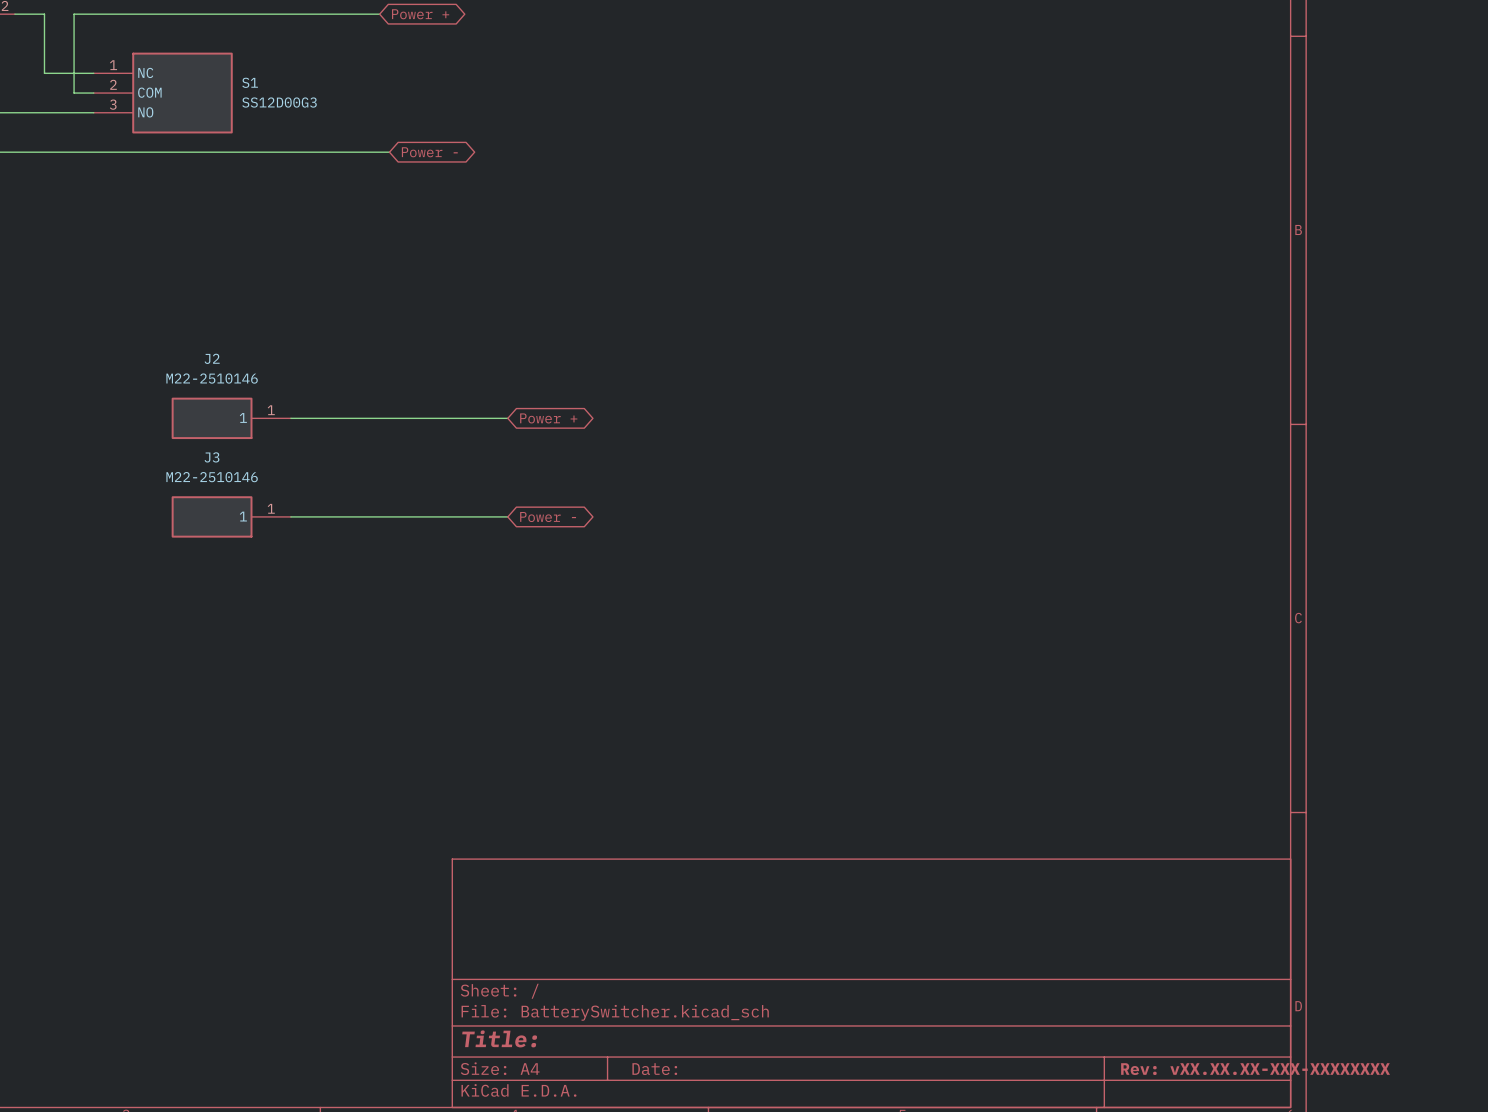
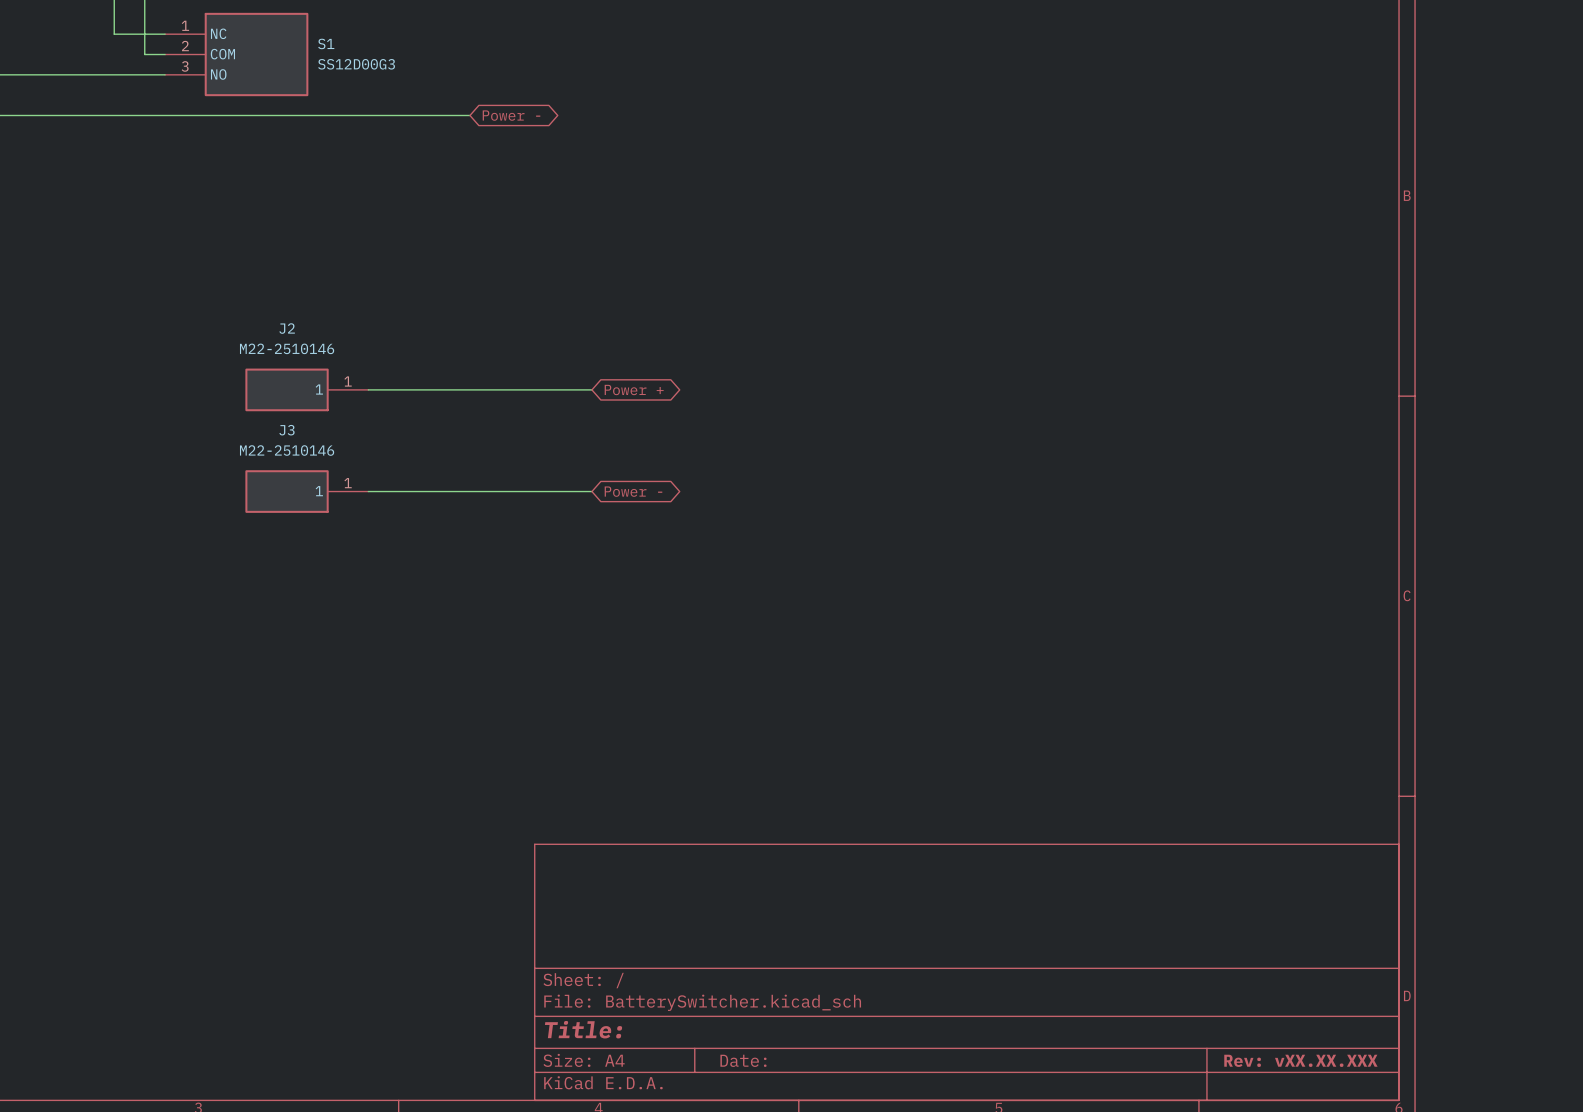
title block: Rev: vXX.XX.XX-XXX-XXXXXXXX (1255, 1069) -> Rev: vXX.XX.XXX (1300, 1060)

